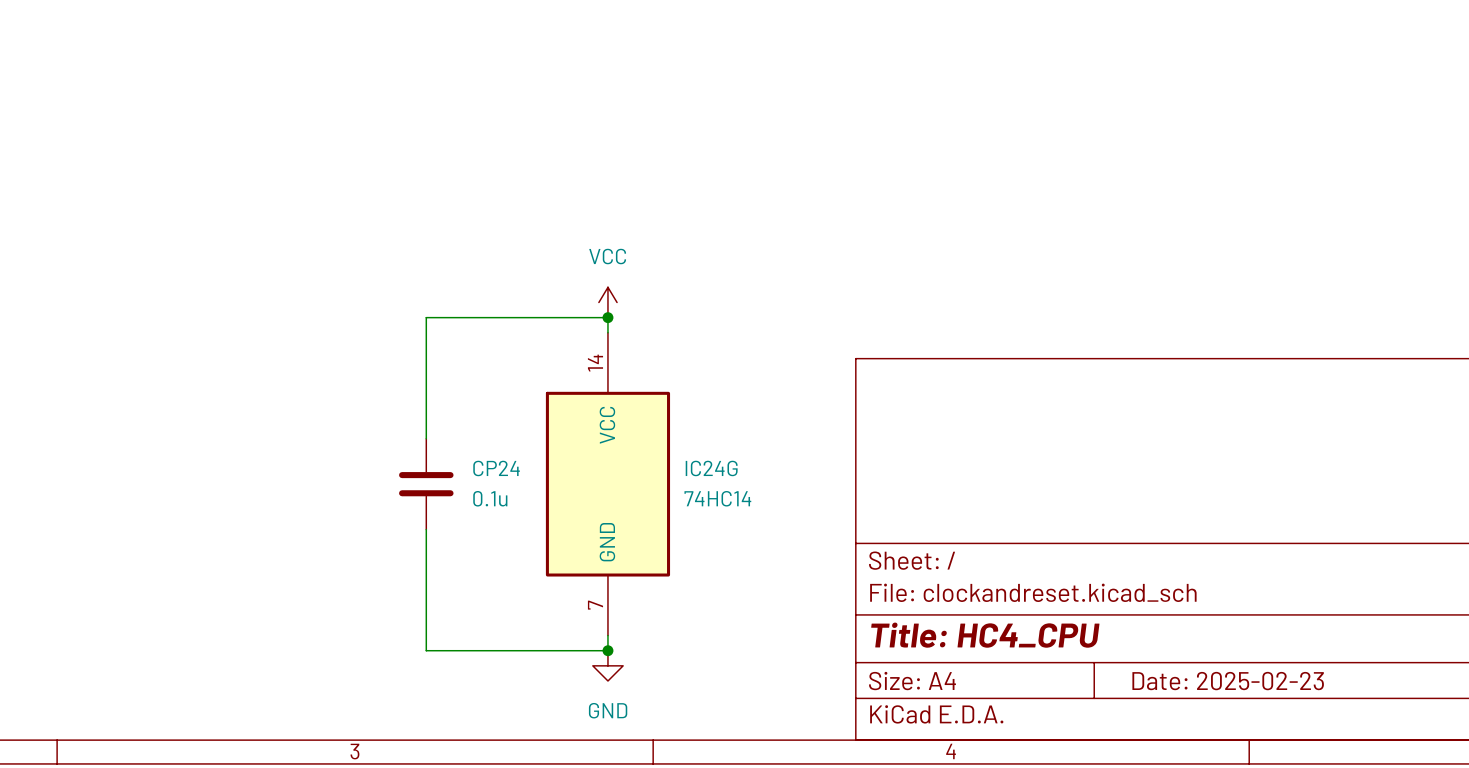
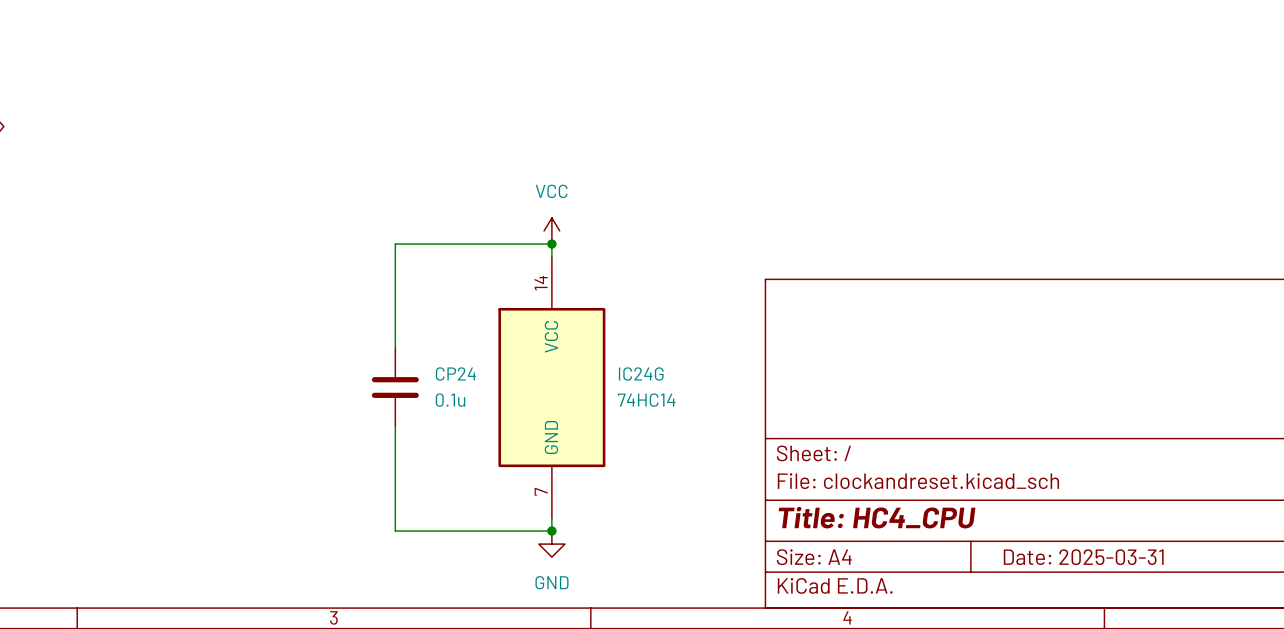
title block: Date: 2025-02-23 (1228, 681) -> Date: 2025-03-31 (1083, 557)

